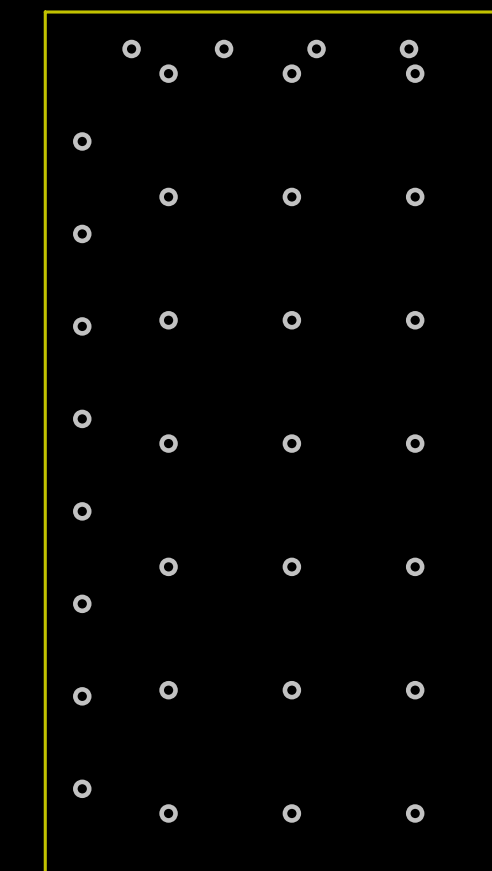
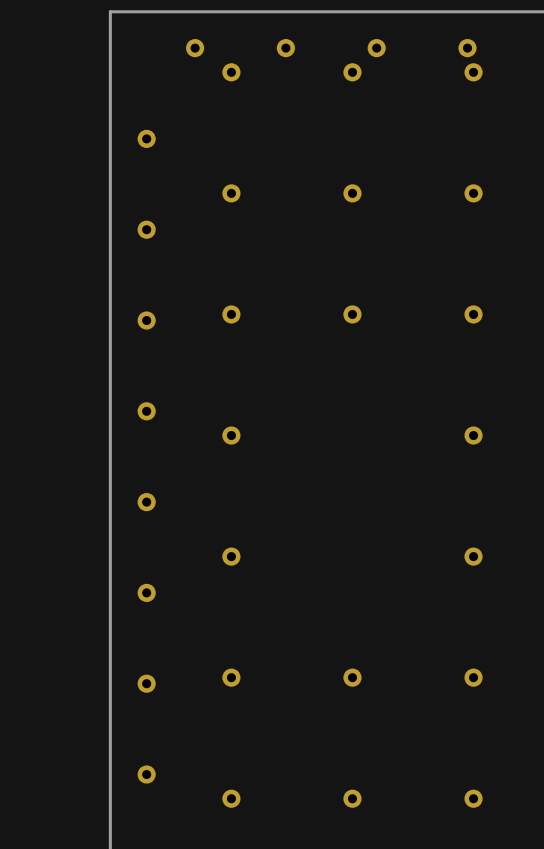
via: (291, 443) -> none
via: (291, 566) -> none

